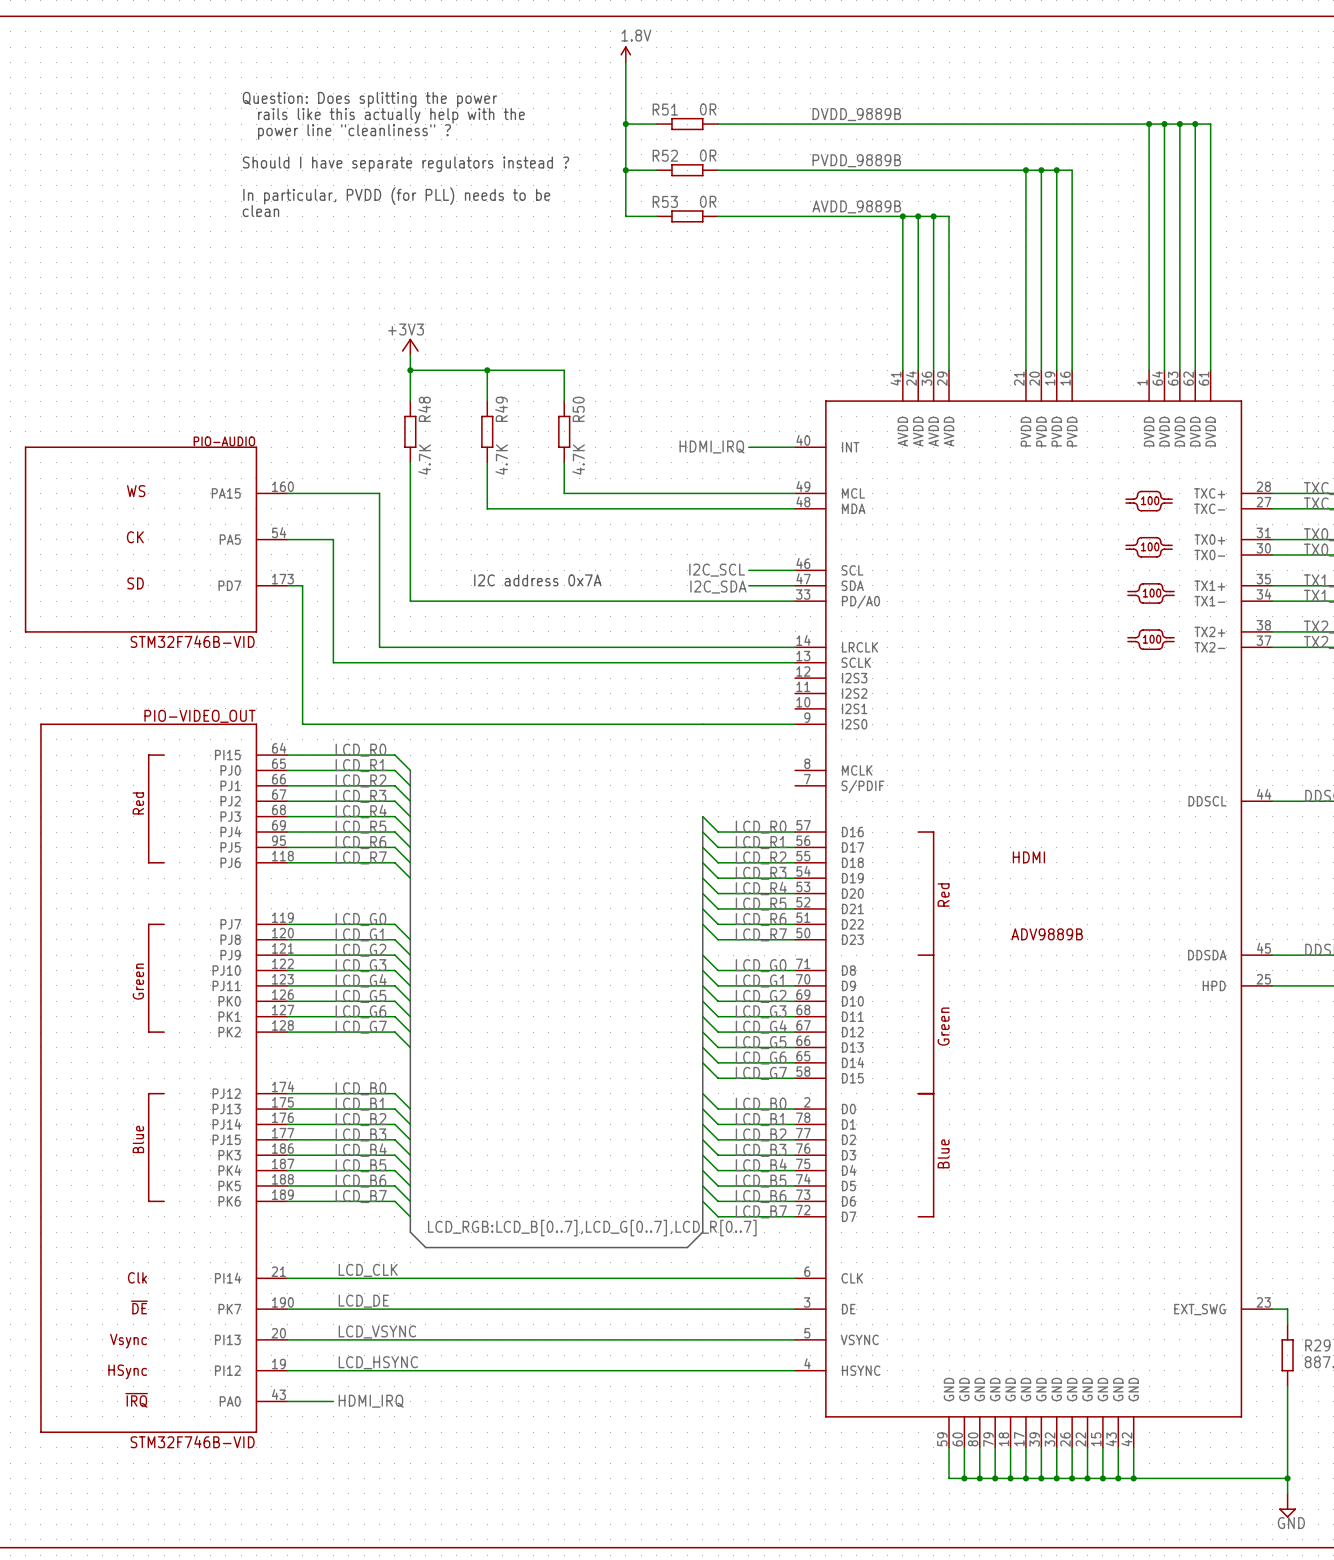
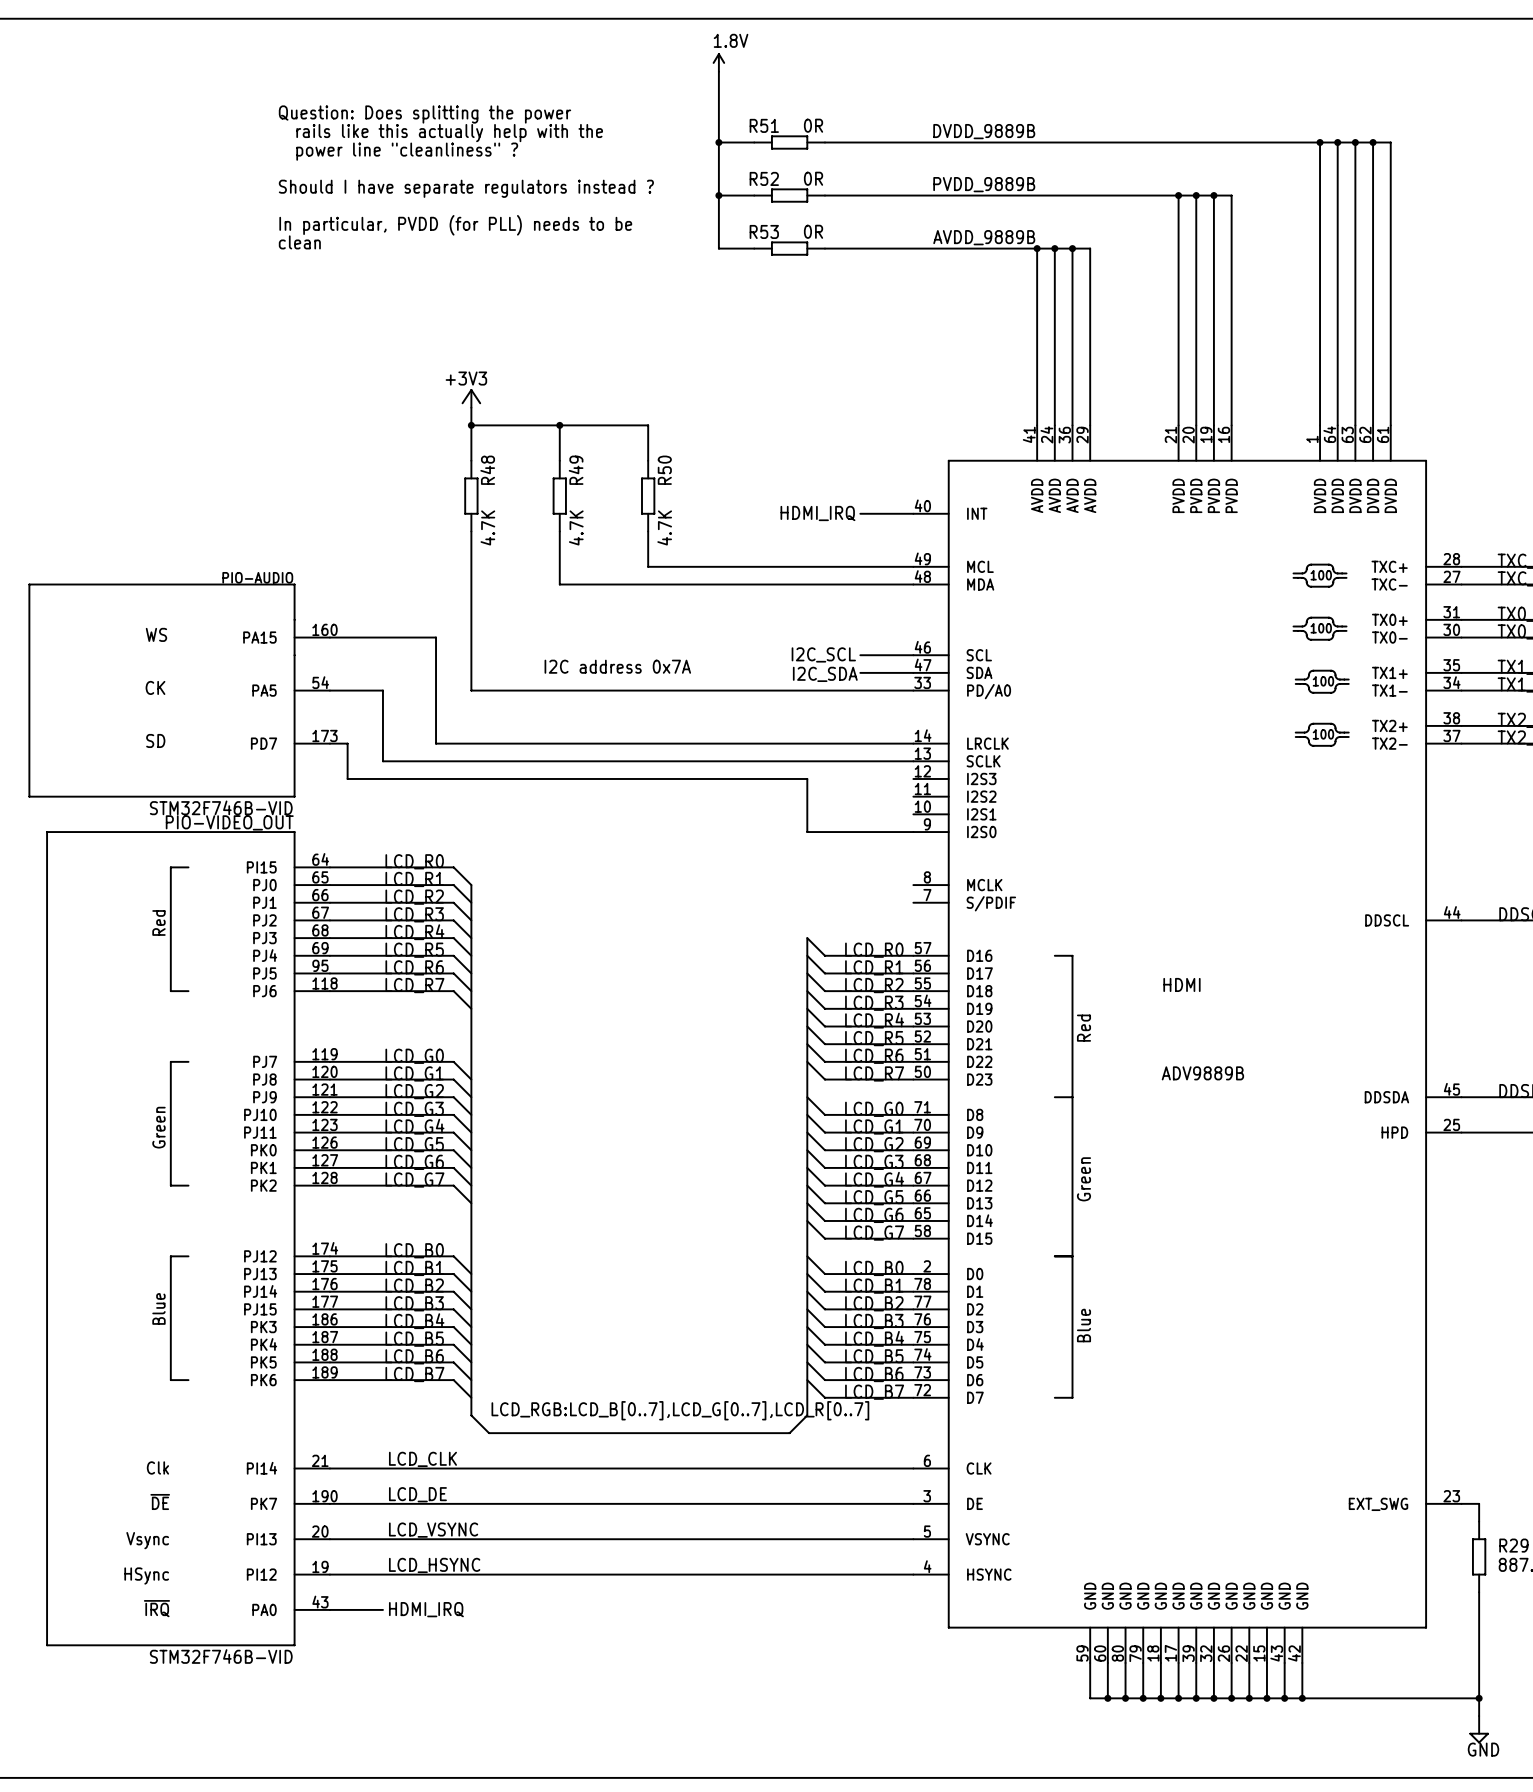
wire: (287, 493) (379, 493) (379, 554) -> (329, 637) (436, 637)
PIO-AUDIO position: (156, 539) -> (179, 690)
wire: (287, 539) (333, 539) (333, 601) -> (329, 690) (382, 690)
wire: (287, 585) (302, 585) (302, 647) -> (329, 743) (347, 743)
wire: (302, 678) (302, 724) (702, 724) -> (347, 778) (807, 778) (807, 832)

